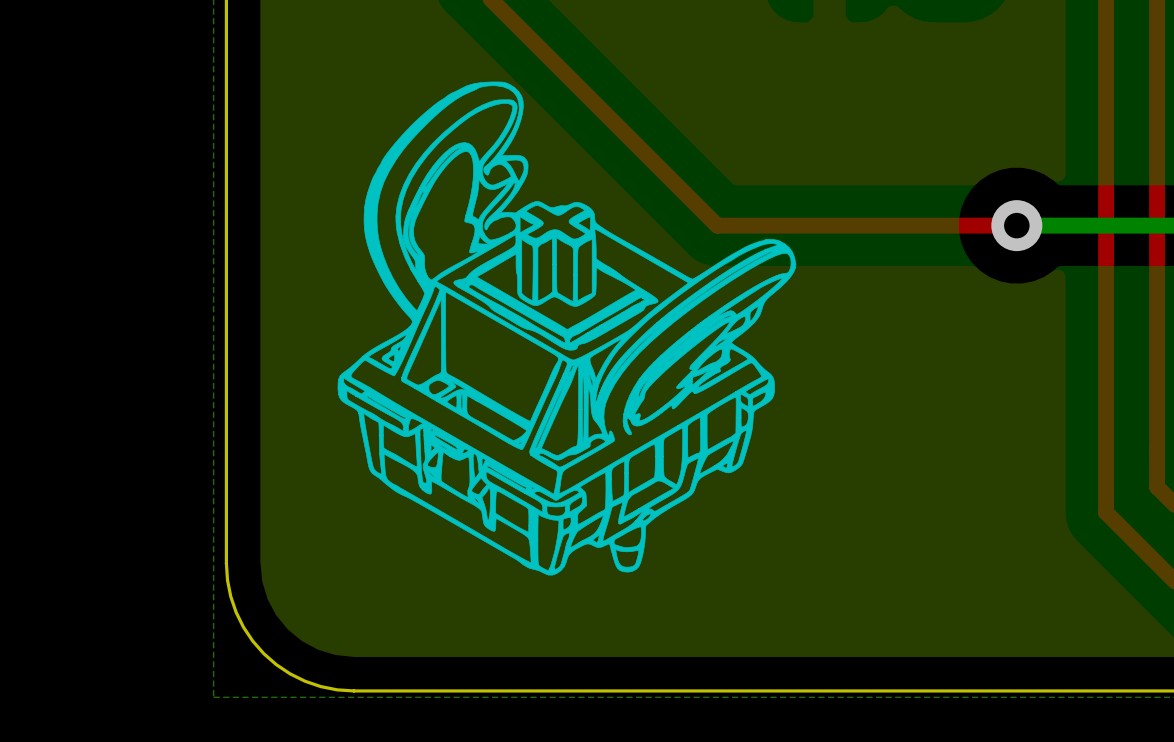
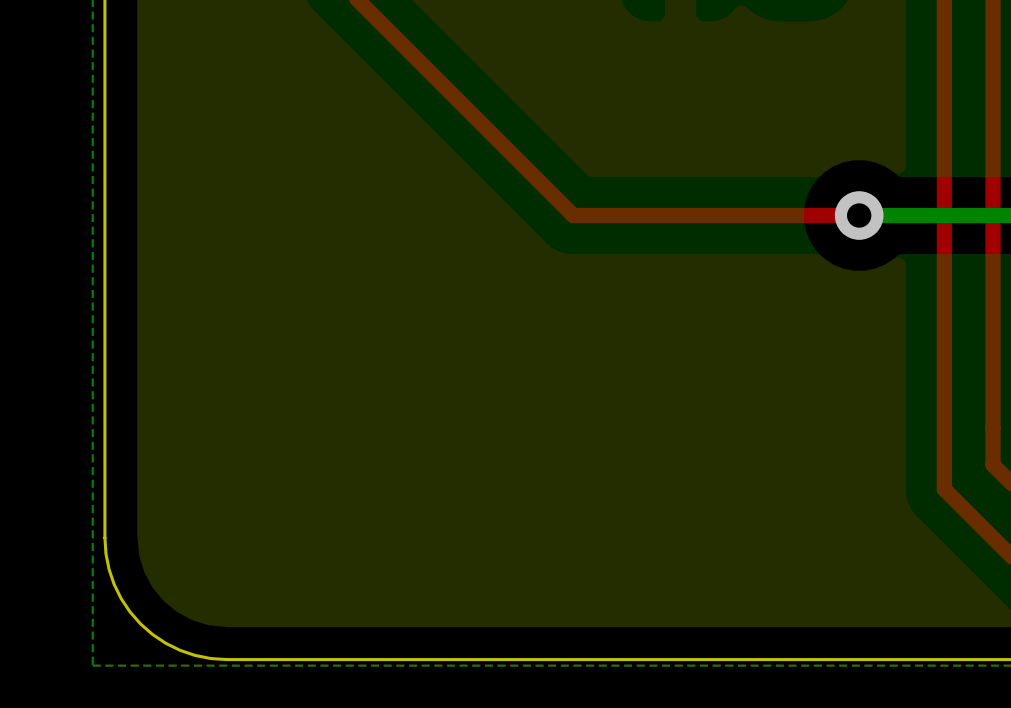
drawing: [337, 81, 797, 576] -> none

